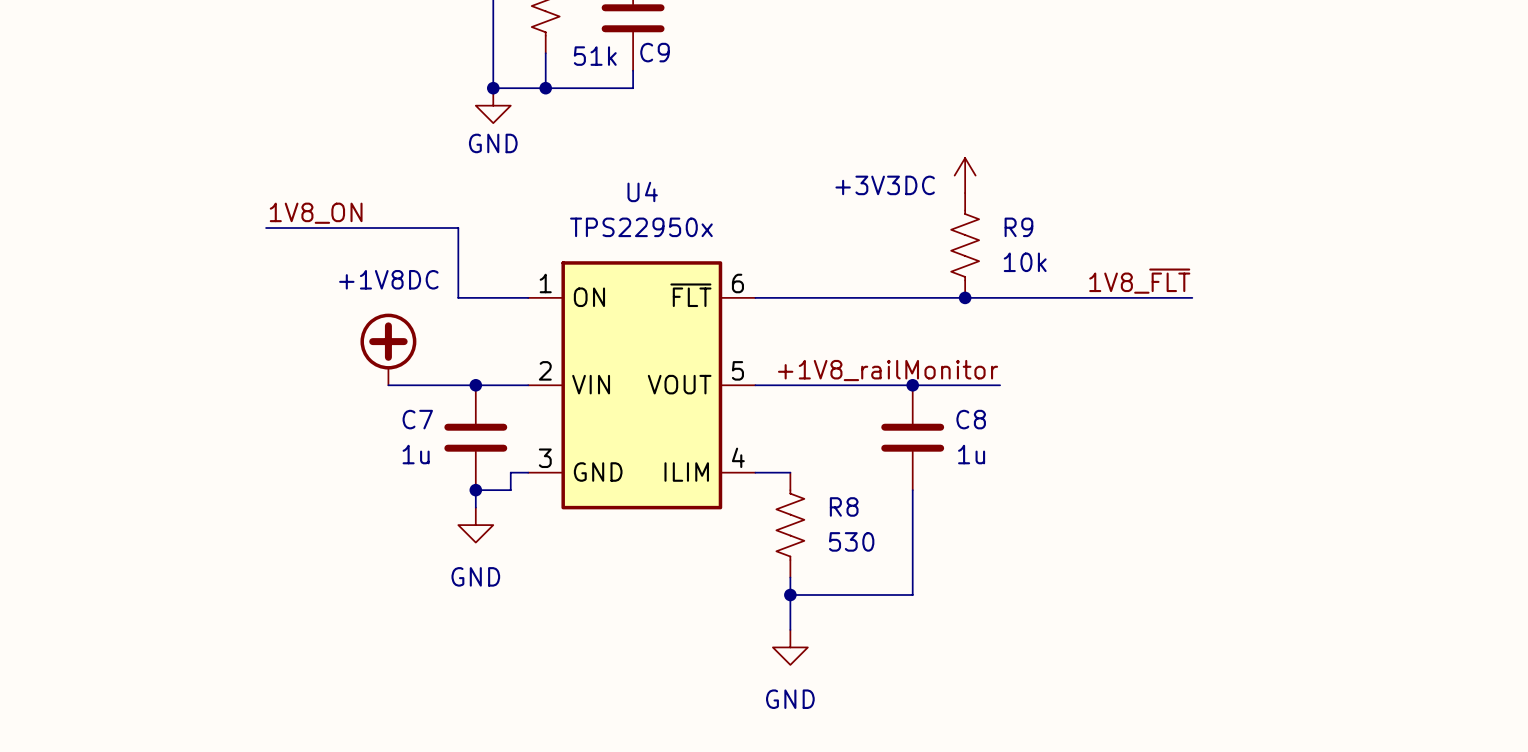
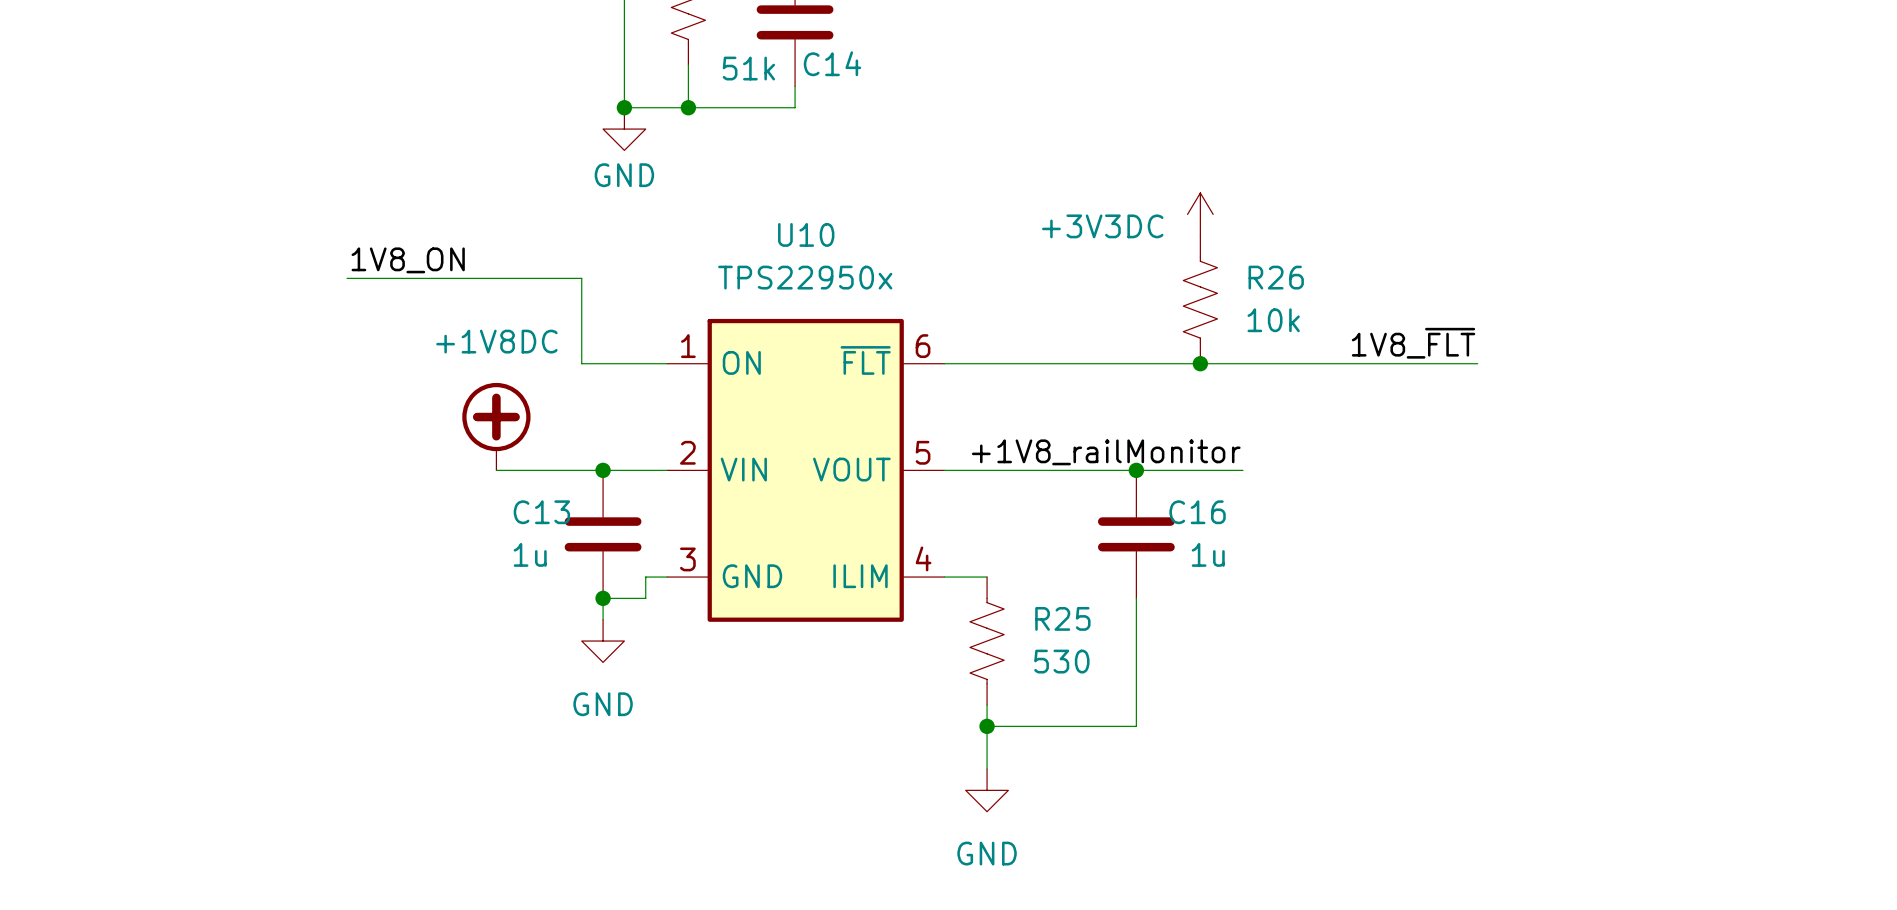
C9 name: C9 (655, 52) -> C14 (832, 63)
U4 name: U4 (642, 191) -> U10 (806, 234)
R9 name: R9 (1018, 227) -> R26 (1276, 277)
C7 name: C7 (417, 419) -> C13 (541, 512)
C8 name: C8 (971, 419) -> C16 (1197, 512)
R8 name: R8 (844, 506) -> R25 (1062, 618)

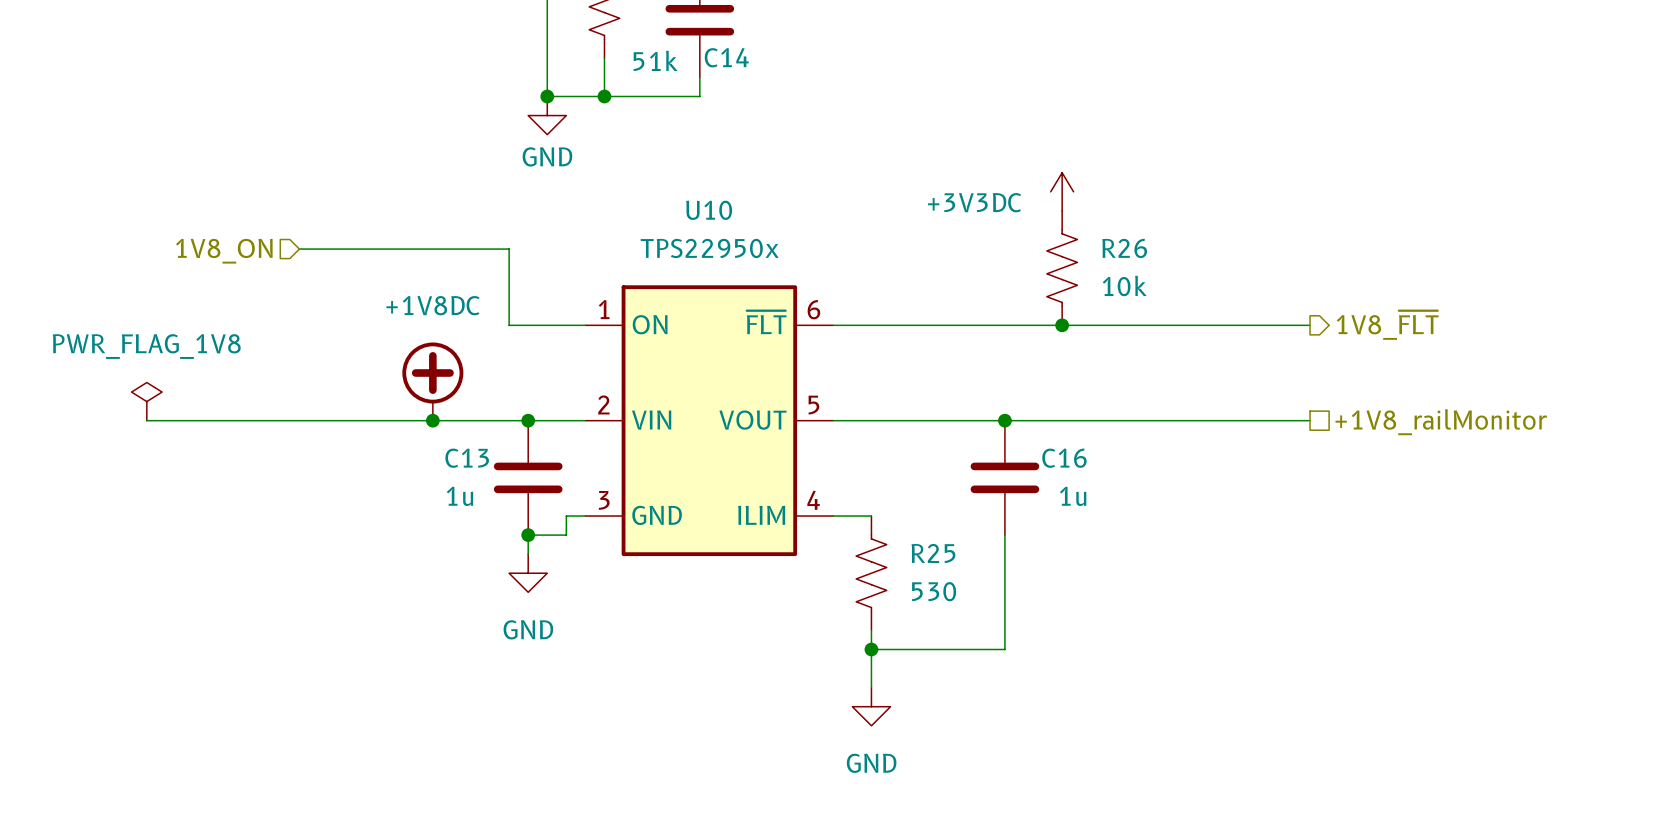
label: 1V8_ON (408, 260) -> none
hierarchical label: none -> 1V8_ON (224, 251)
label: 1V8_~{FLT} (1413, 343) -> none
hierarchical label: none -> 1V8_~{FLT} (1387, 325)
power symbol: none -> PWR_FLAG_1V8 (146, 401)
label: +1V8_railMonitor (1106, 452) -> none
wire: none -> (146, 420) (432, 420)
junction: none -> (432, 420)
wire: none -> (1100, 420) (1310, 420)
hierarchical label: none -> +1V8_railMonitor (1441, 422)

